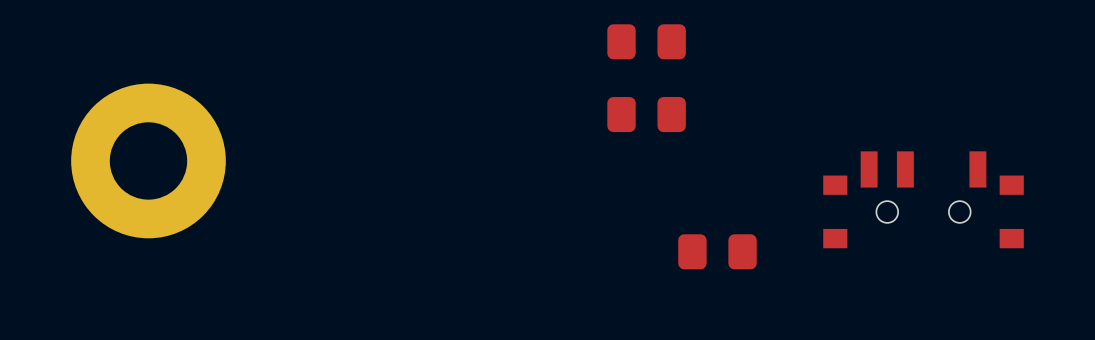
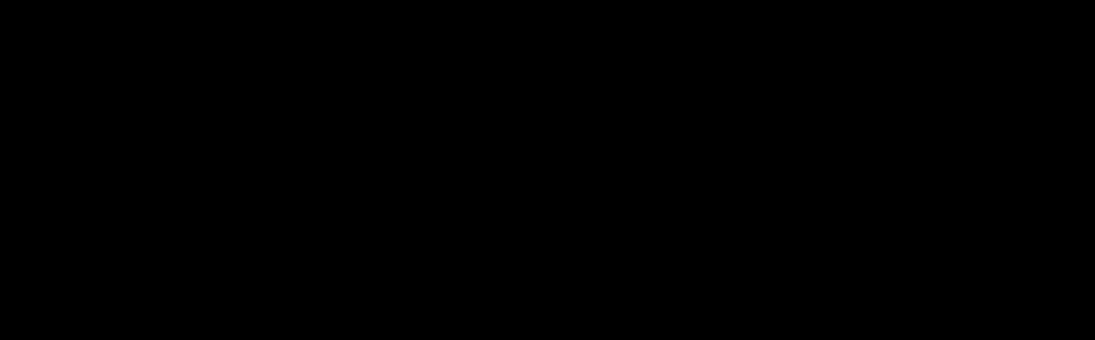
part: (646, 41) -> none
part: (646, 114) -> none
part: (148, 160) -> none
part: (923, 199) -> none
part: (717, 251) -> none

